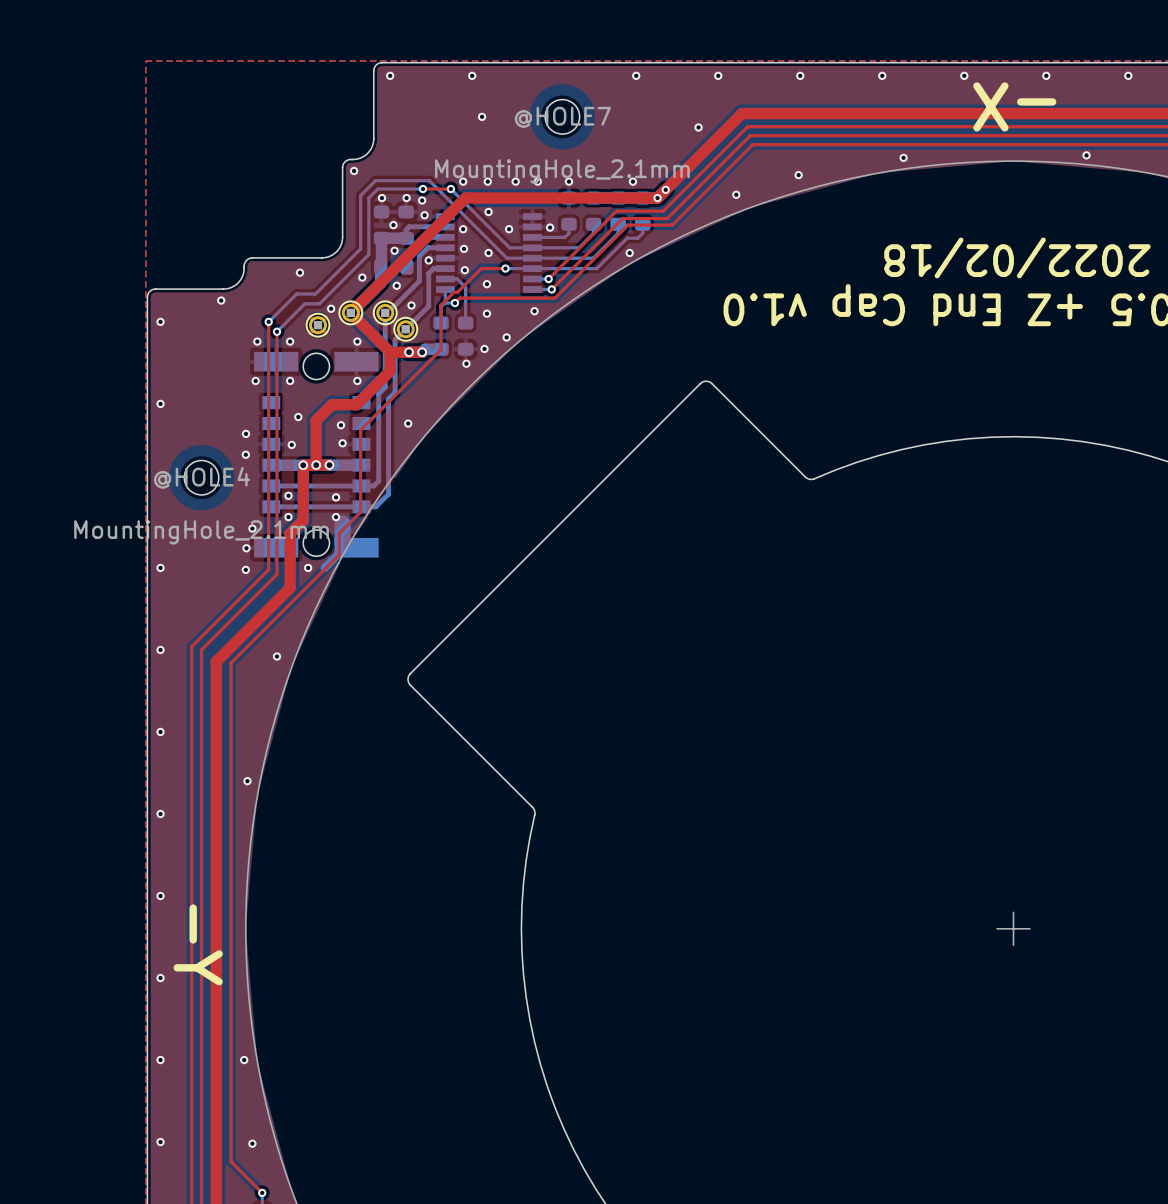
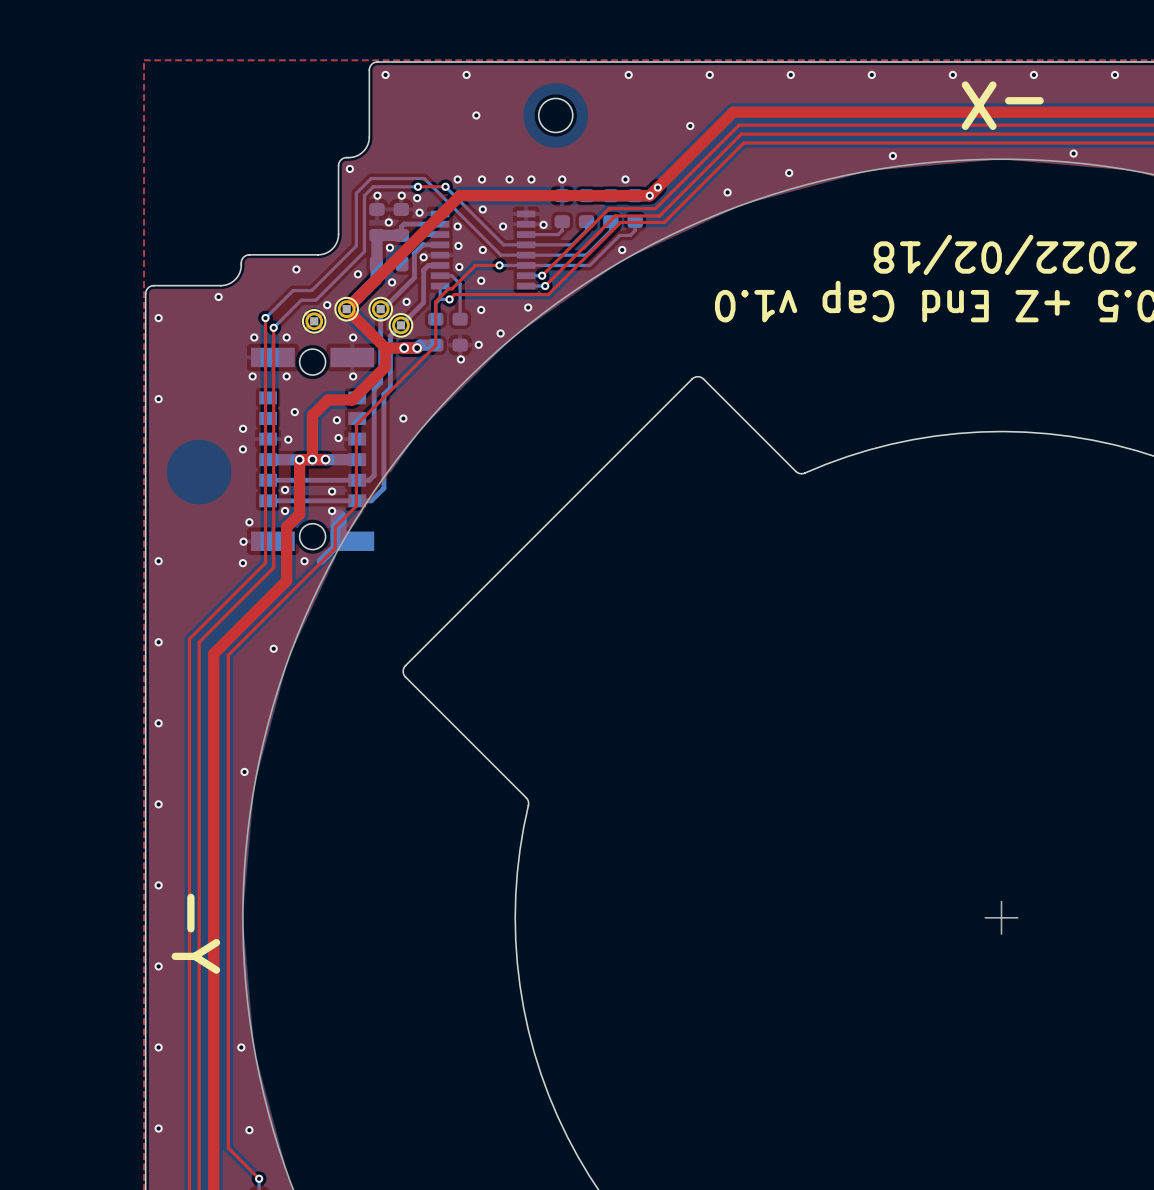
@HOLE7 name: @HOLE7 (562, 117) -> none
@HOLE7 value: MountingHole_2.1mm (562, 171) -> none
@HOLE4: MountingHole_2.1mm (201, 477) -> none

